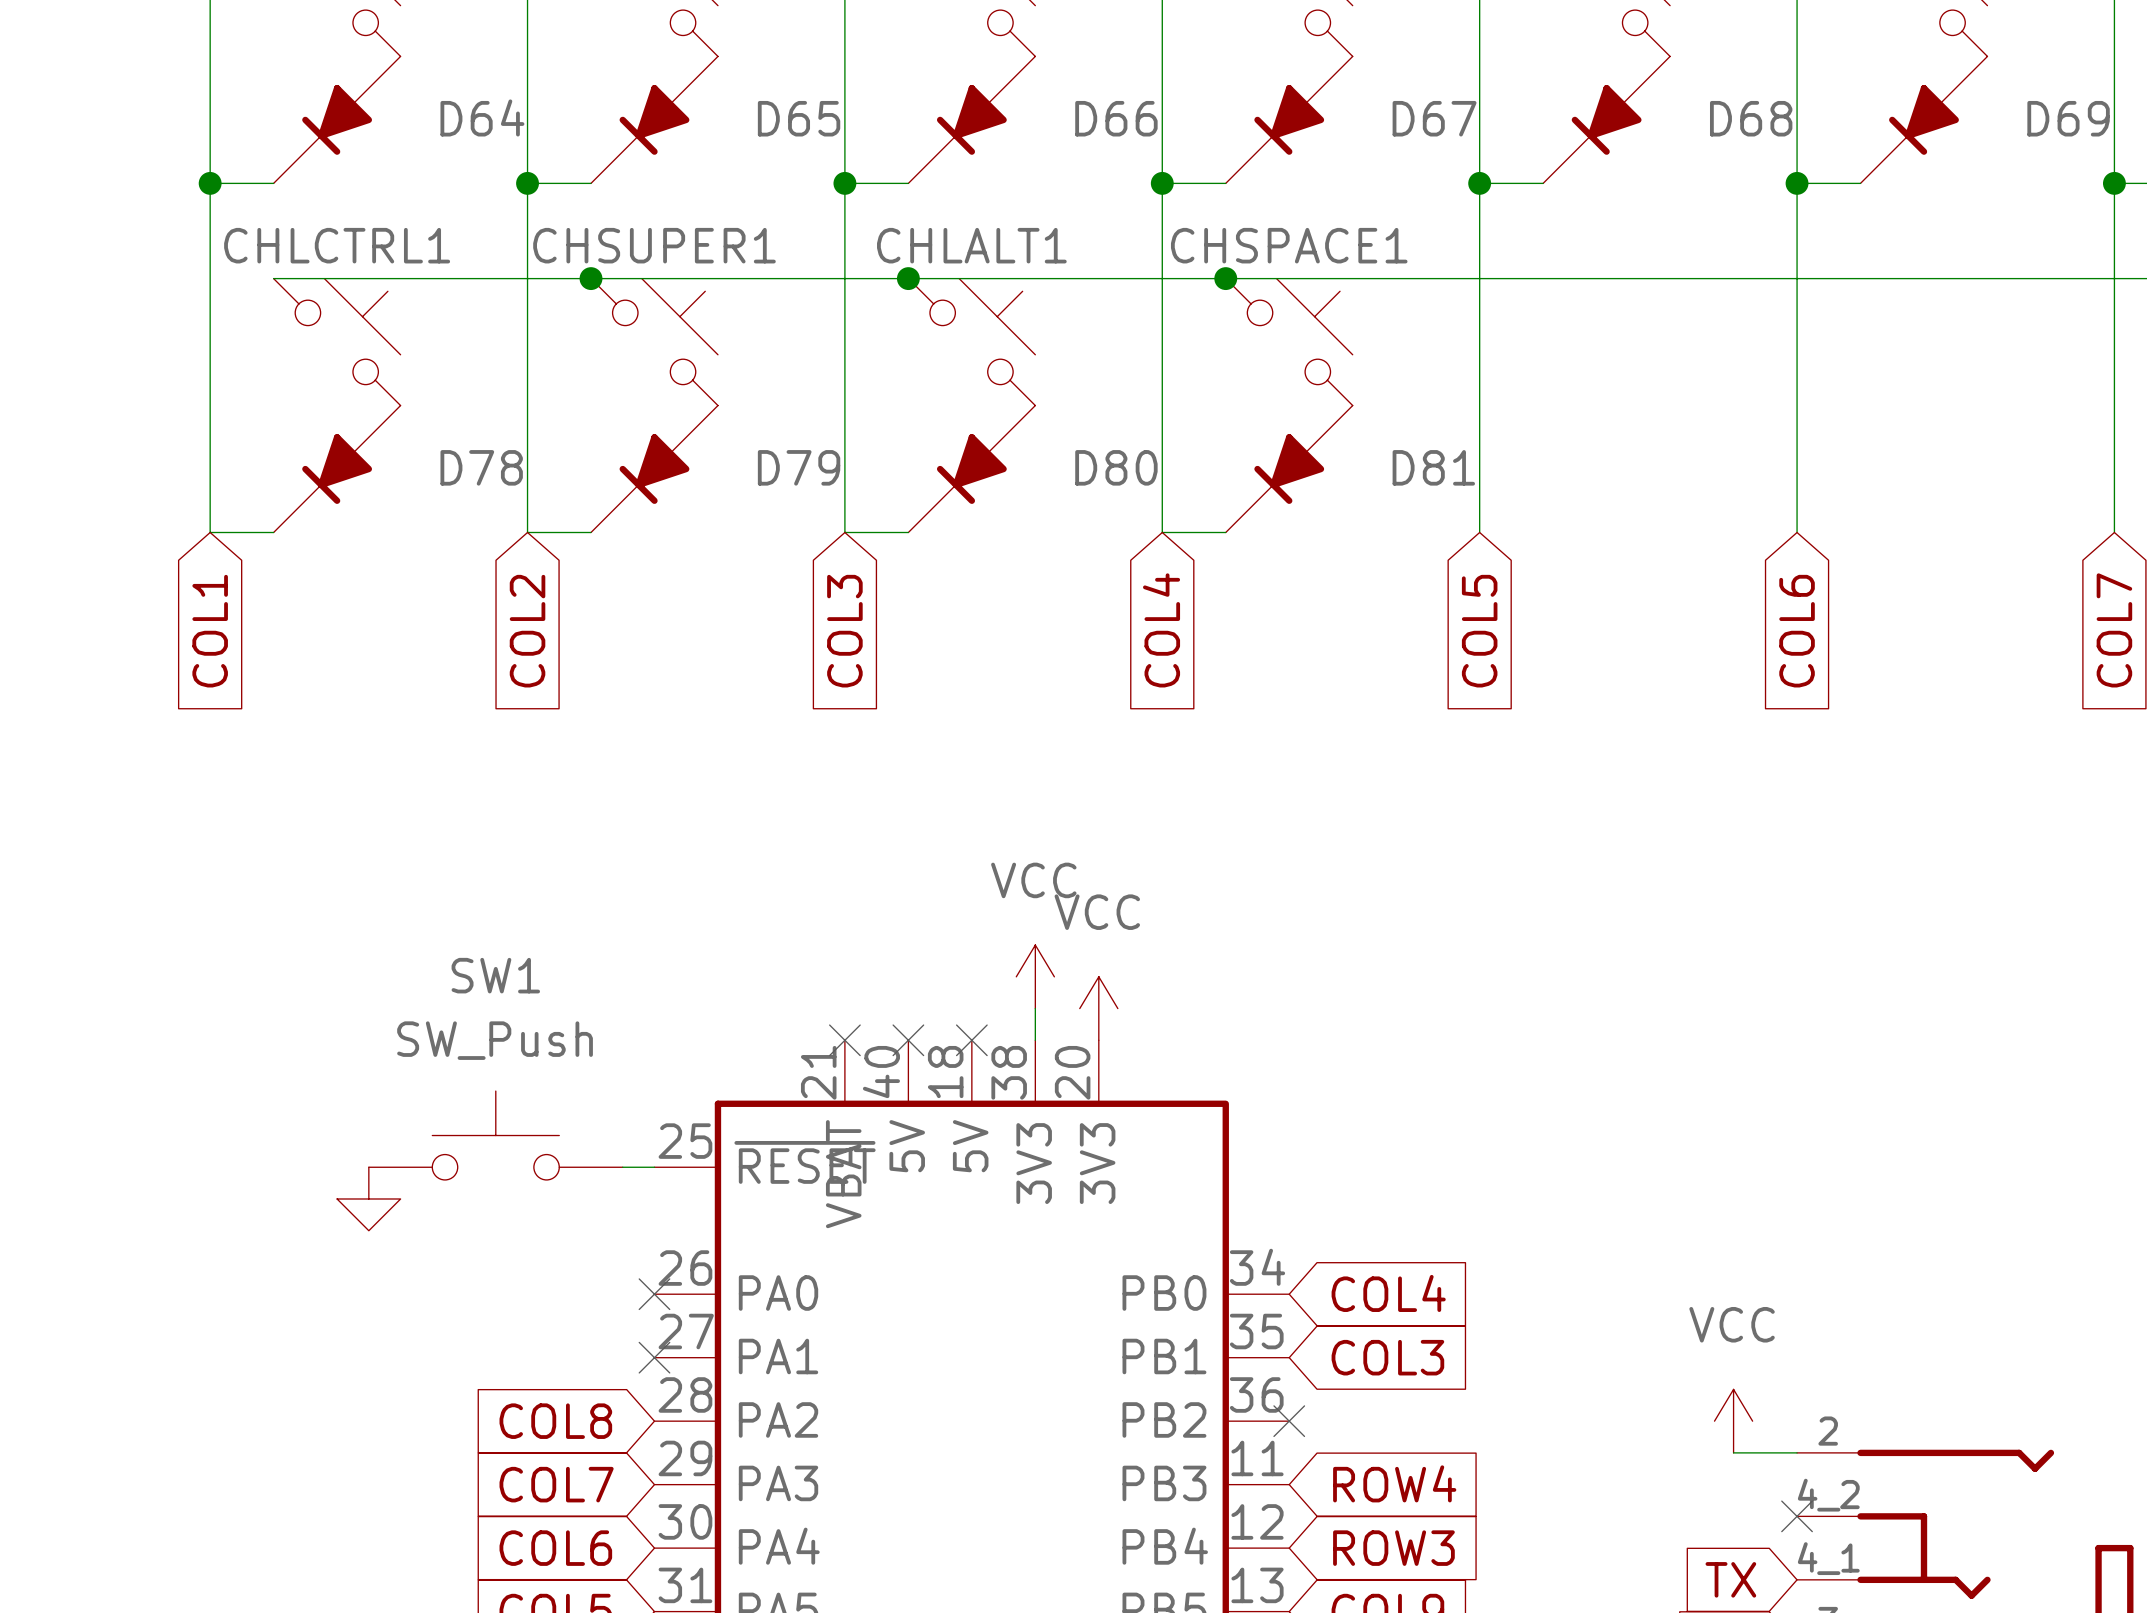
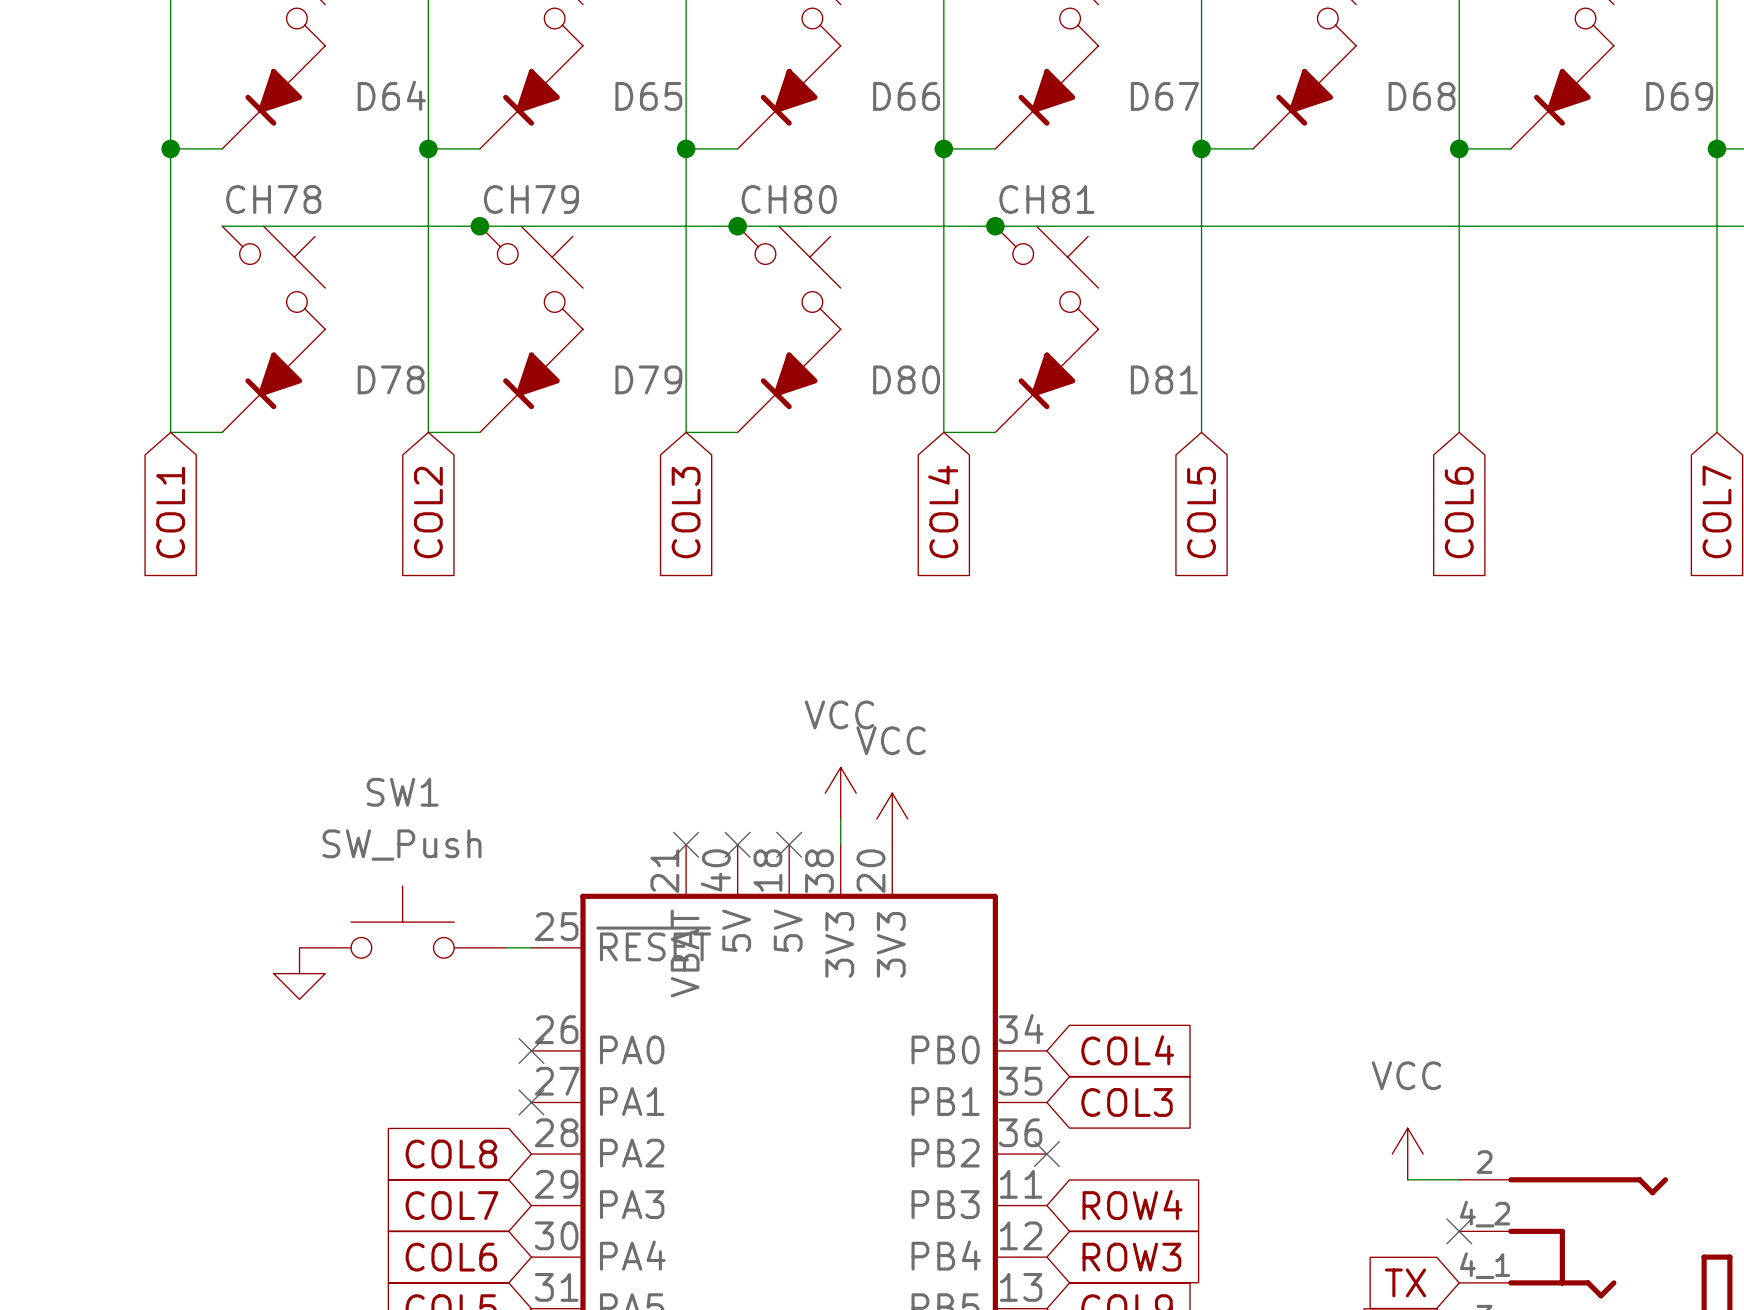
CHLCTRL1 name: CHLCTRL1 (337, 245) -> CH78 (273, 199)
CHSUPER1 name: CHSUPER1 (654, 245) -> CH79 (531, 199)
CHLALT1 name: CHLALT1 (971, 245) -> CH80 (789, 199)
CHSPACE1 name: CHSPACE1 (1289, 245) -> CH81 (1046, 199)

